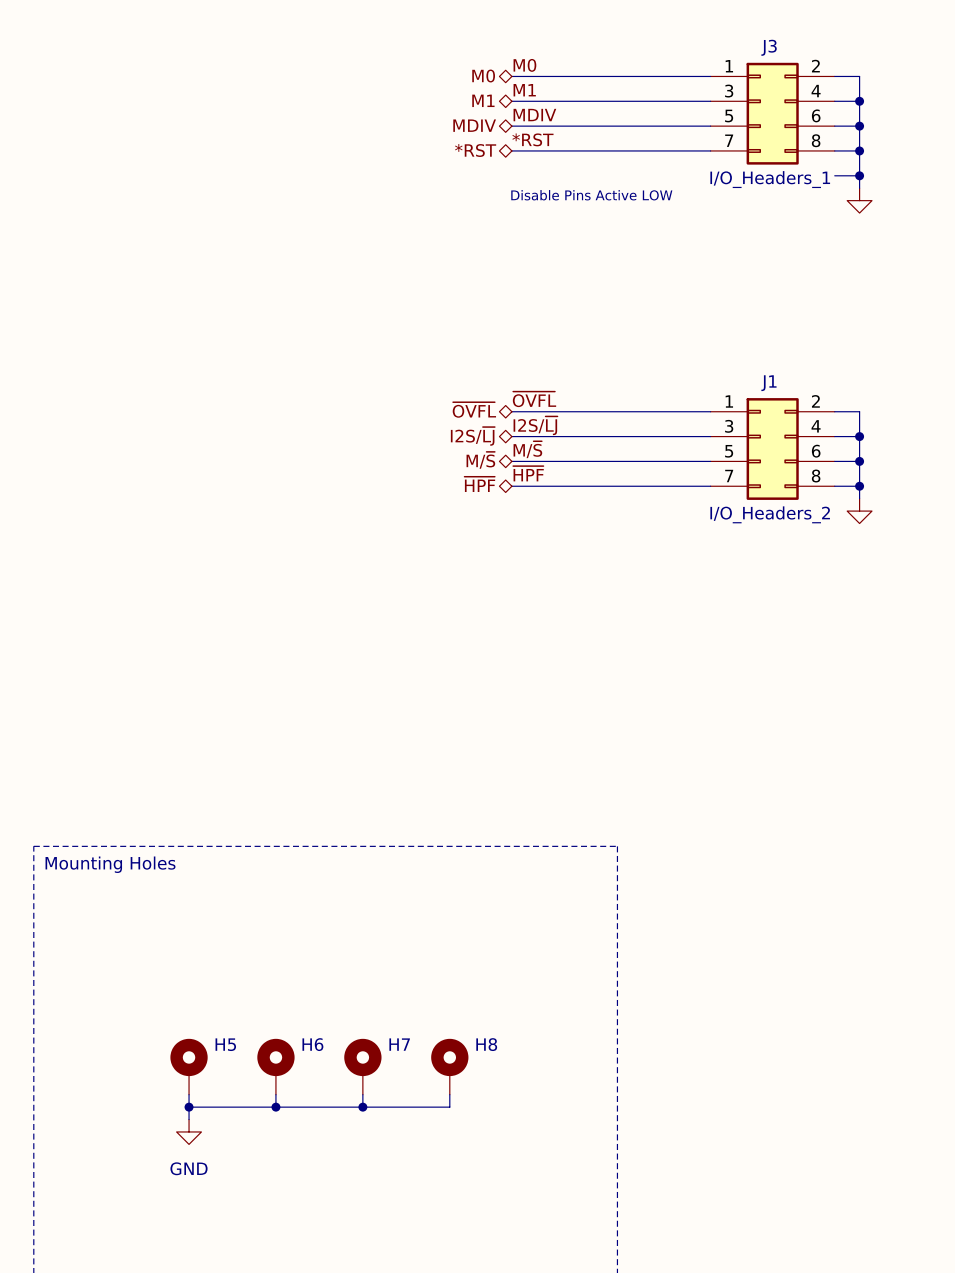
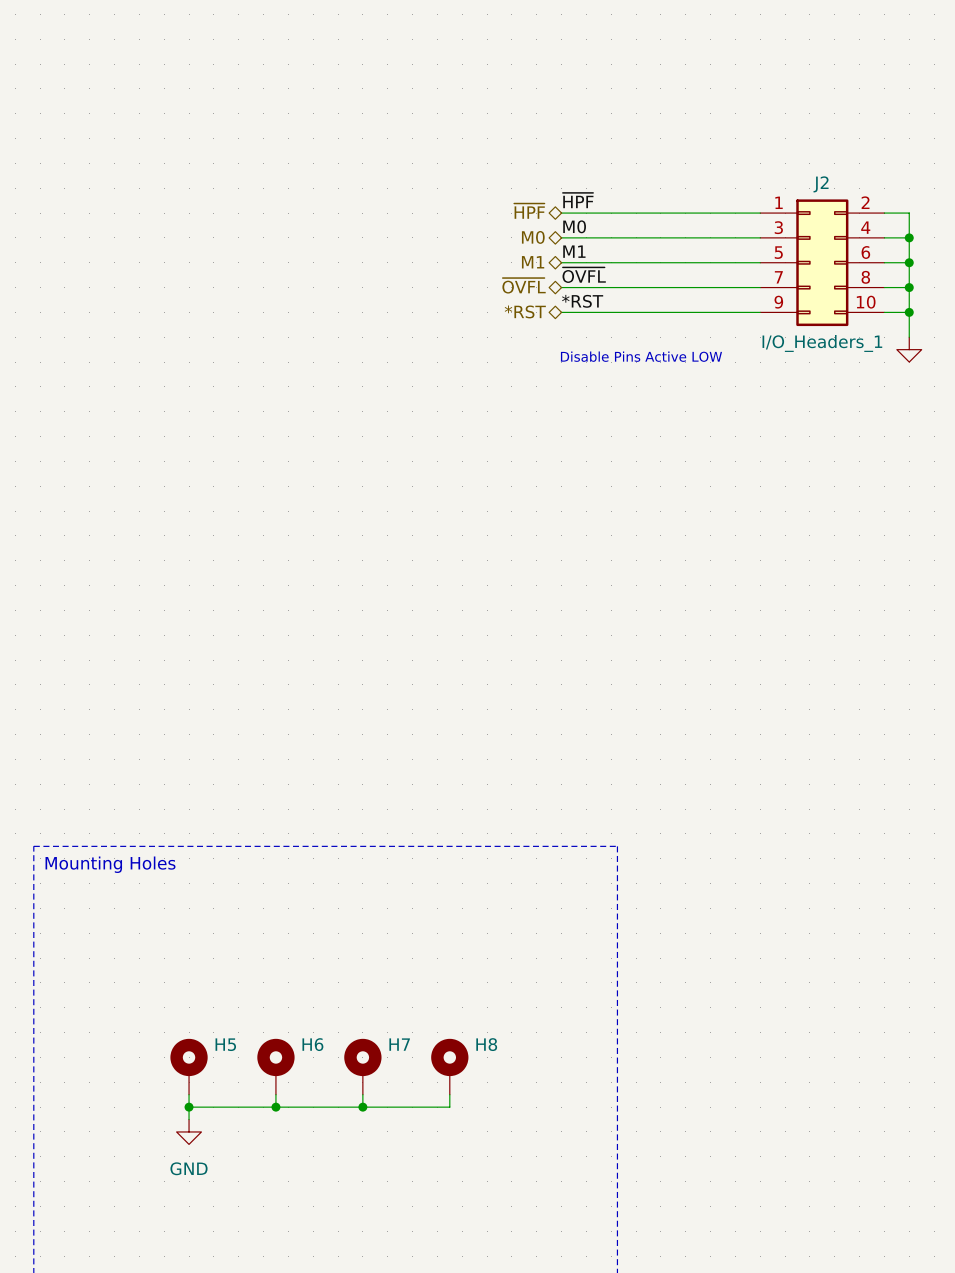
label position: M0 (524, 65) -> M0 (574, 226)
hierarchical label position: M0 (483, 76) -> M0 (533, 237)
wire: (511, 76) (710, 76) -> (561, 213) (760, 213)
wire: (834, 76) (859, 76) (859, 188) -> none
label position: M1 (524, 90) -> M1 (574, 251)
hierarchical label position: M1 (483, 100) -> M1 (533, 262)
wire: (511, 101) (710, 101) -> (561, 237) (760, 237)
wire: (834, 101) (859, 101) -> (884, 237) (909, 237)
junction: (859, 101) -> none
J3: I/O_Headers_1 (772, 113) -> none
label: MDIV (534, 115) -> none
hierarchical label: MDIV (474, 125) -> none
wire: (511, 126) (710, 126) -> (561, 262) (760, 262)
wire: (834, 126) (859, 126) -> (884, 262) (909, 262)
junction: (859, 126) -> none
label position: *RST (532, 139) -> *RST (582, 301)
hierarchical label position: *RST (475, 150) -> *RST (525, 311)
wire: (511, 150) (710, 150) -> (561, 287) (760, 287)
wire: (834, 150) (859, 150) -> (884, 287) (909, 287)
junction: (859, 150) -> none
wire: (834, 175) (859, 175) -> (884, 312) (909, 312)
junction: (859, 175) -> none
text position: Disable Pins Active LOW (591, 195) -> Disable Pins Active LOW (641, 356)
label: none -> ~{HPF} (578, 200)
power symbol: (859, 200) -> none
hierarchical label: none -> ~{HPF} (529, 211)
wire: none -> (884, 213) (909, 213) (909, 337)
junction: none -> (909, 237)
J2: none -> I/O_Headers_1 (822, 262)
junction: none -> (909, 262)
junction: none -> (909, 287)
junction: none -> (909, 312)
power symbol: none -> (909, 349)
label position: ~{OVFL} (534, 399) -> ~{OVFL} (584, 275)
hierarchical label position: ~{OVFL} (474, 409) -> ~{OVFL} (524, 285)
wire: (511, 411) (710, 411) -> none
wire: (834, 411) (859, 411) (859, 498) -> none
label: I2S/~{LJ} (535, 425) -> none
hierarchical label: I2S/~{LJ} (472, 436) -> none
wire: (511, 436) (710, 436) -> none
wire: (834, 436) (859, 436) -> none
junction: (859, 436) -> none
J1: I/O_Headers_2 (772, 448) -> none
label: M/~{S} (527, 449) -> none
hierarchical label: M/~{S} (480, 460) -> none
wire: (511, 461) (710, 461) -> none
wire: (834, 461) (859, 461) -> none
junction: (859, 461) -> none
label: ~{HPF} (528, 473) -> none
hierarchical label: ~{HPF} (479, 484) -> none
wire: (511, 486) (710, 486) -> (561, 312) (760, 312)
wire: (834, 486) (859, 486) -> none
junction: (859, 486) -> none
power symbol: (859, 511) -> none

